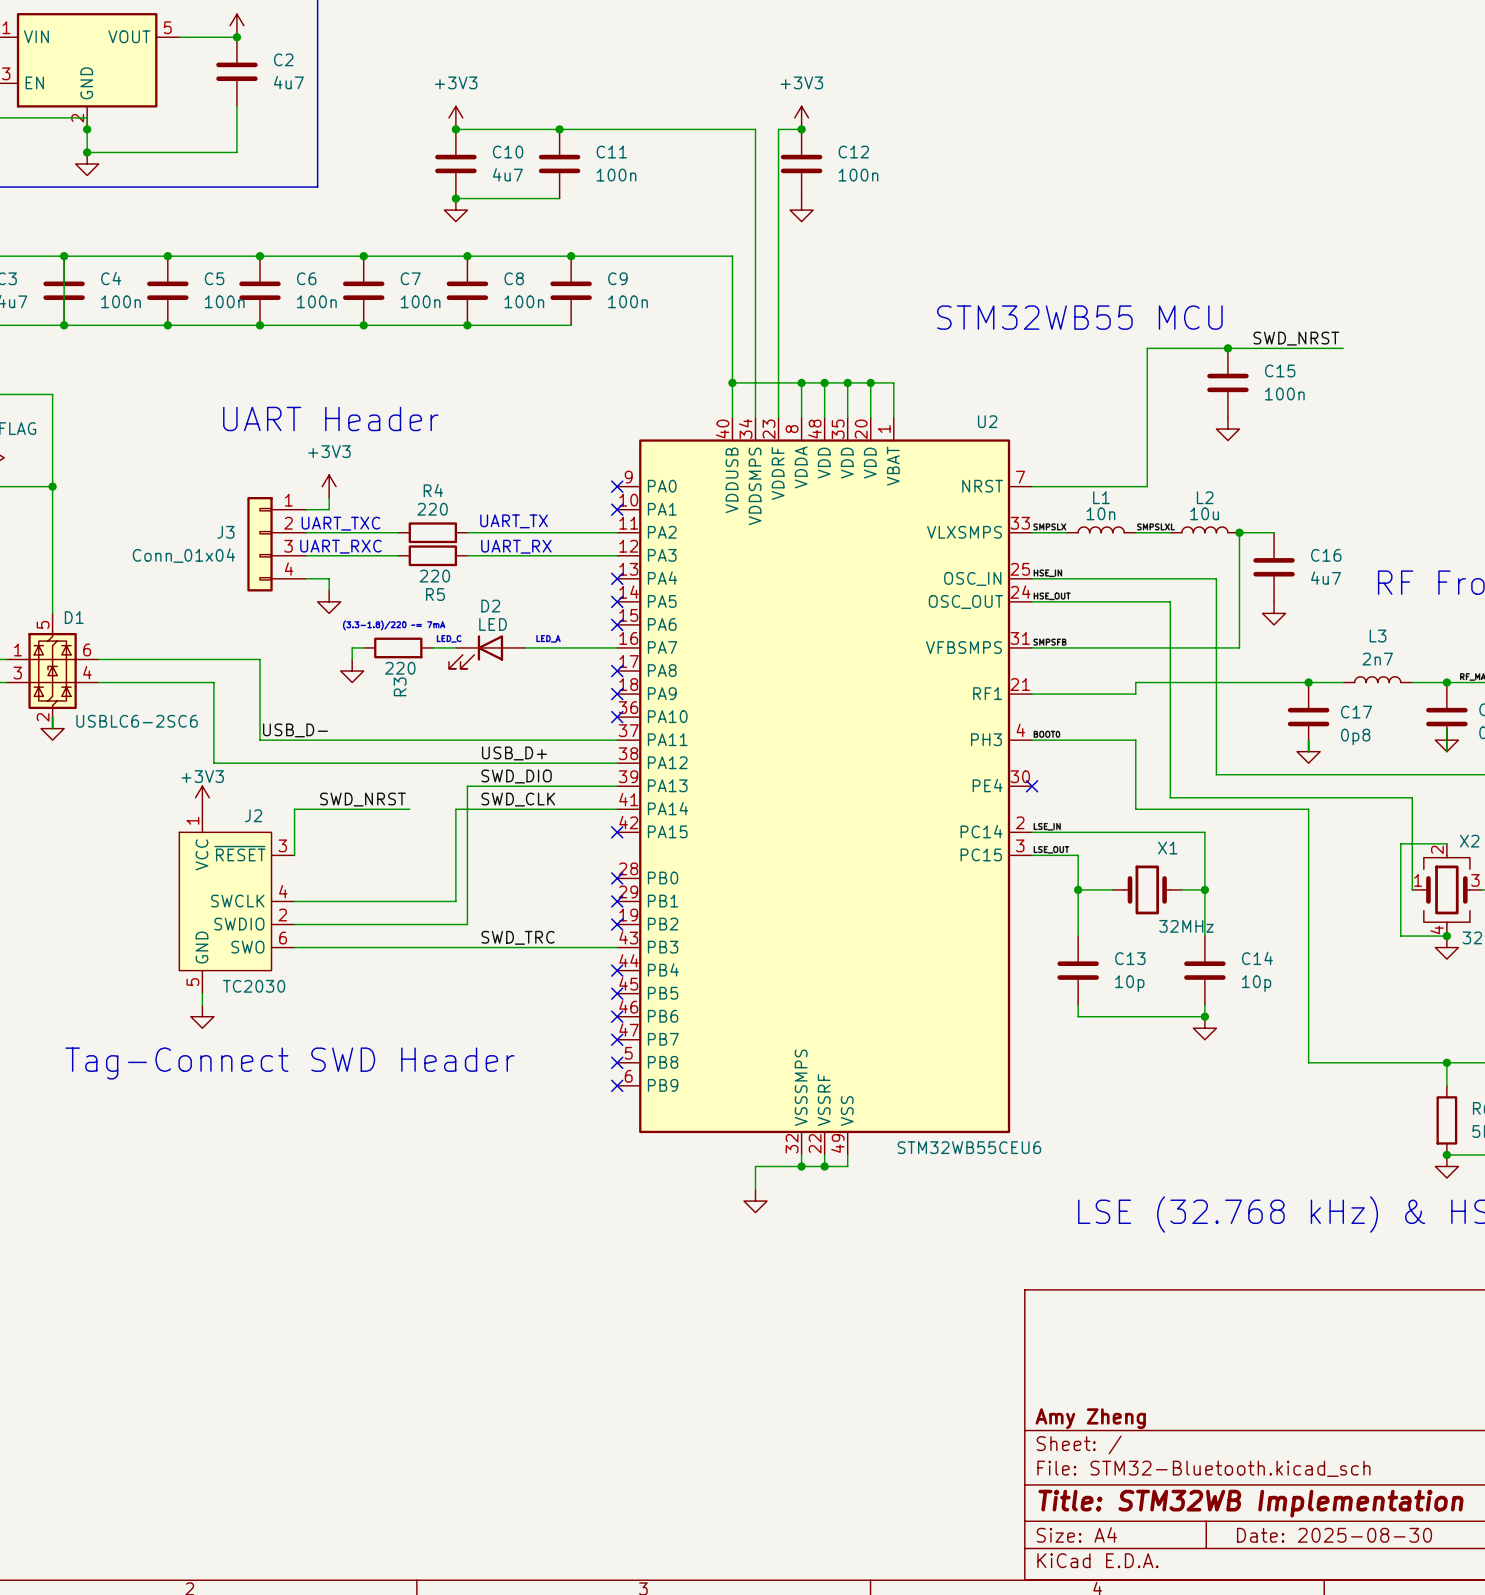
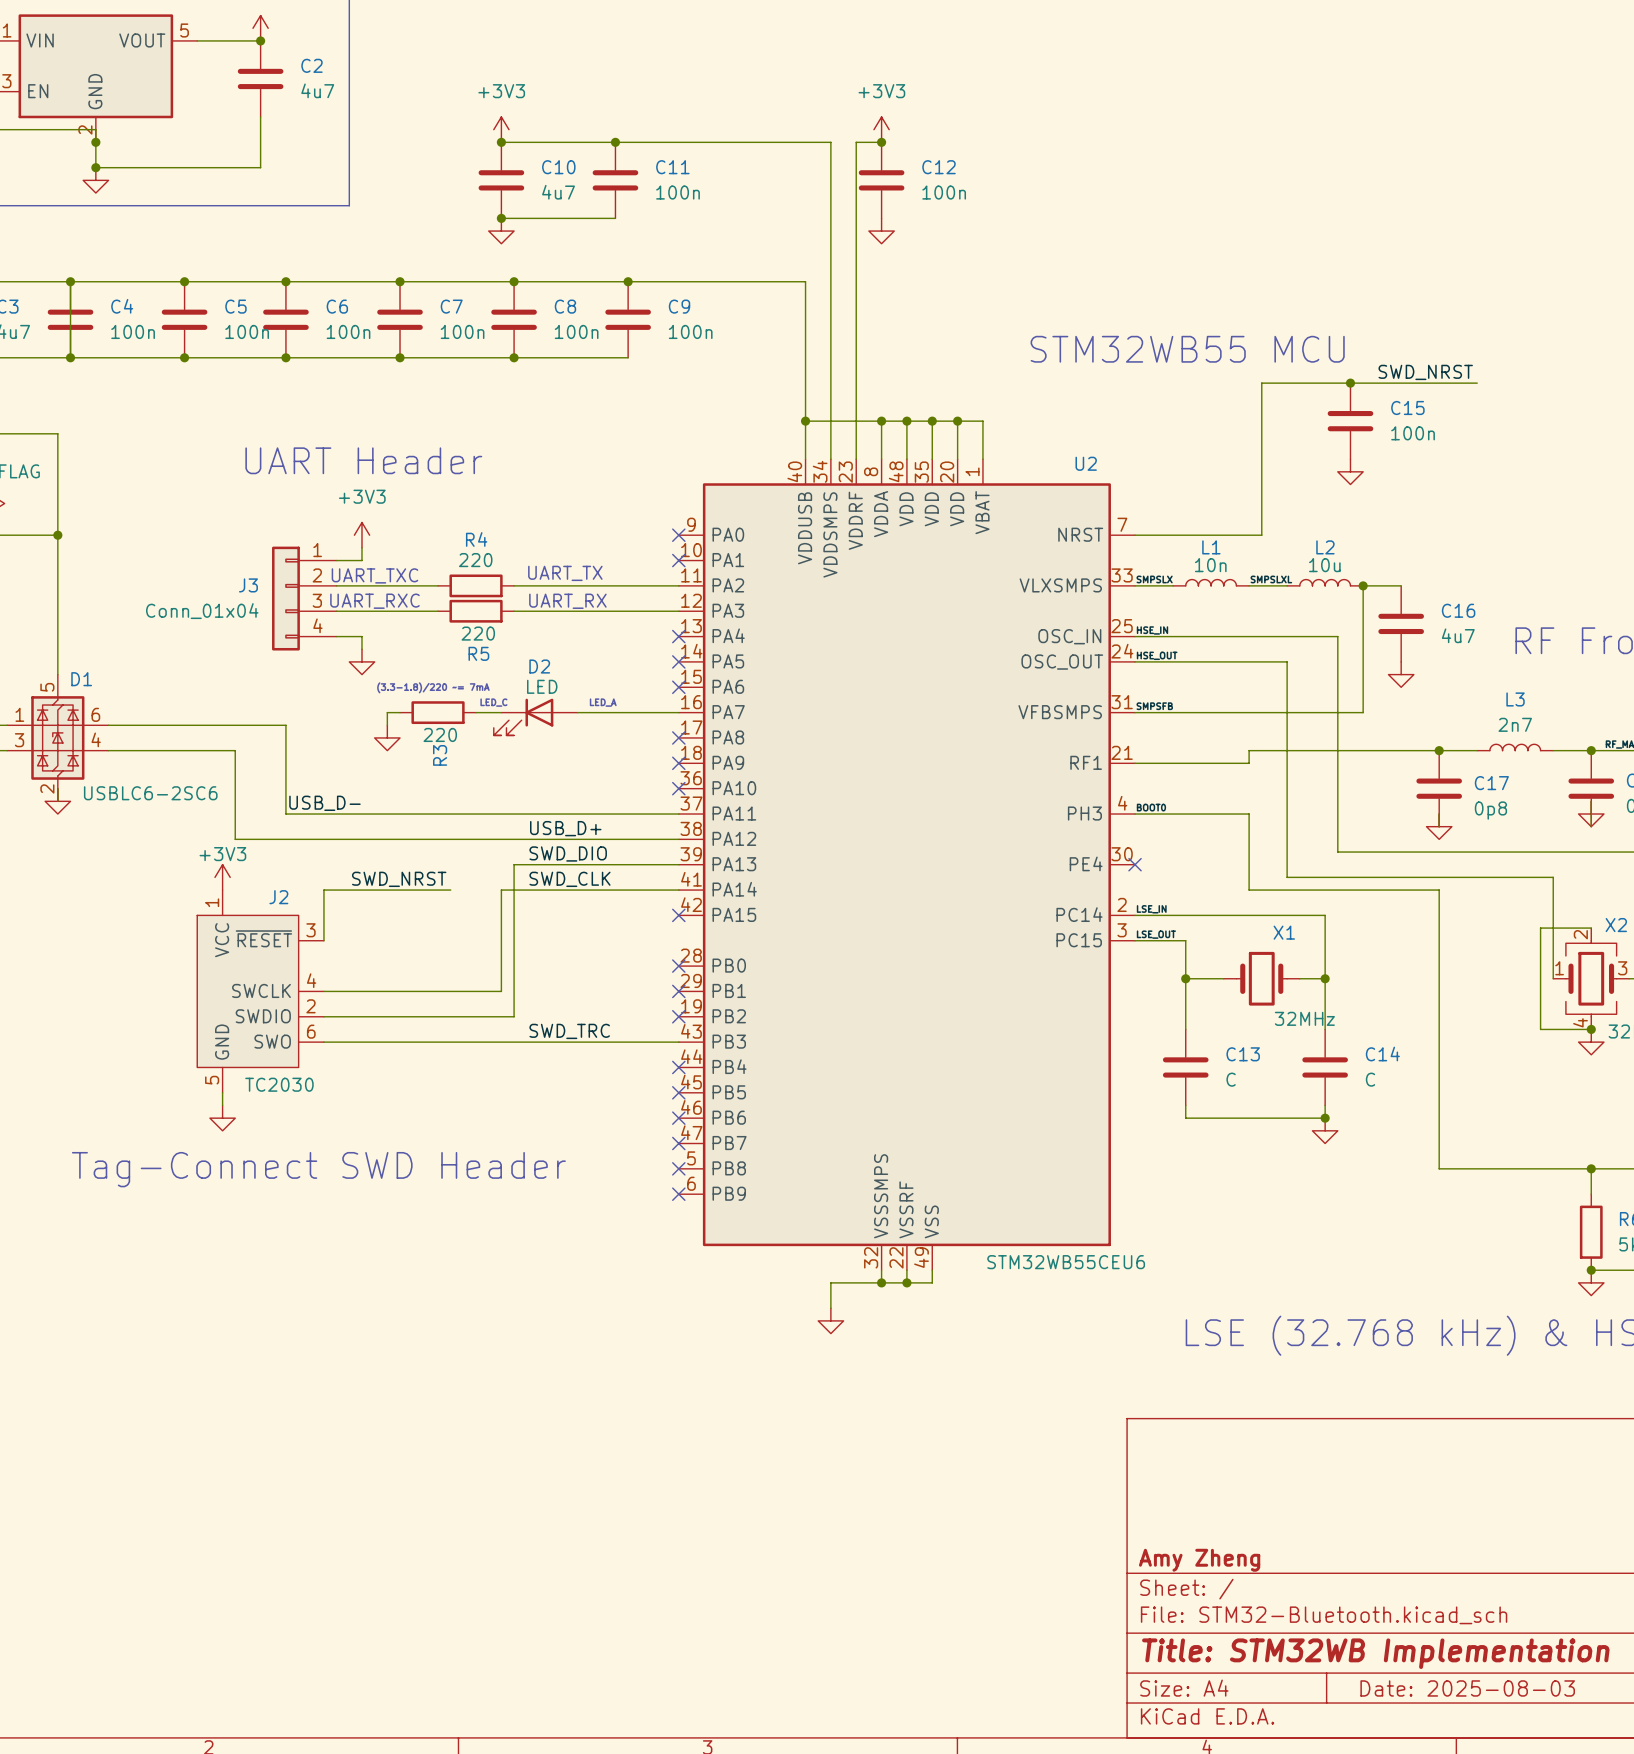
C13 value: 10p (1129, 983) -> C (1231, 1079)
C14 value: 10p (1256, 983) -> C (1370, 1079)
title block: Date: 2025-08-30 (1334, 1535) -> Date: 2025-08-03 (1467, 1688)

